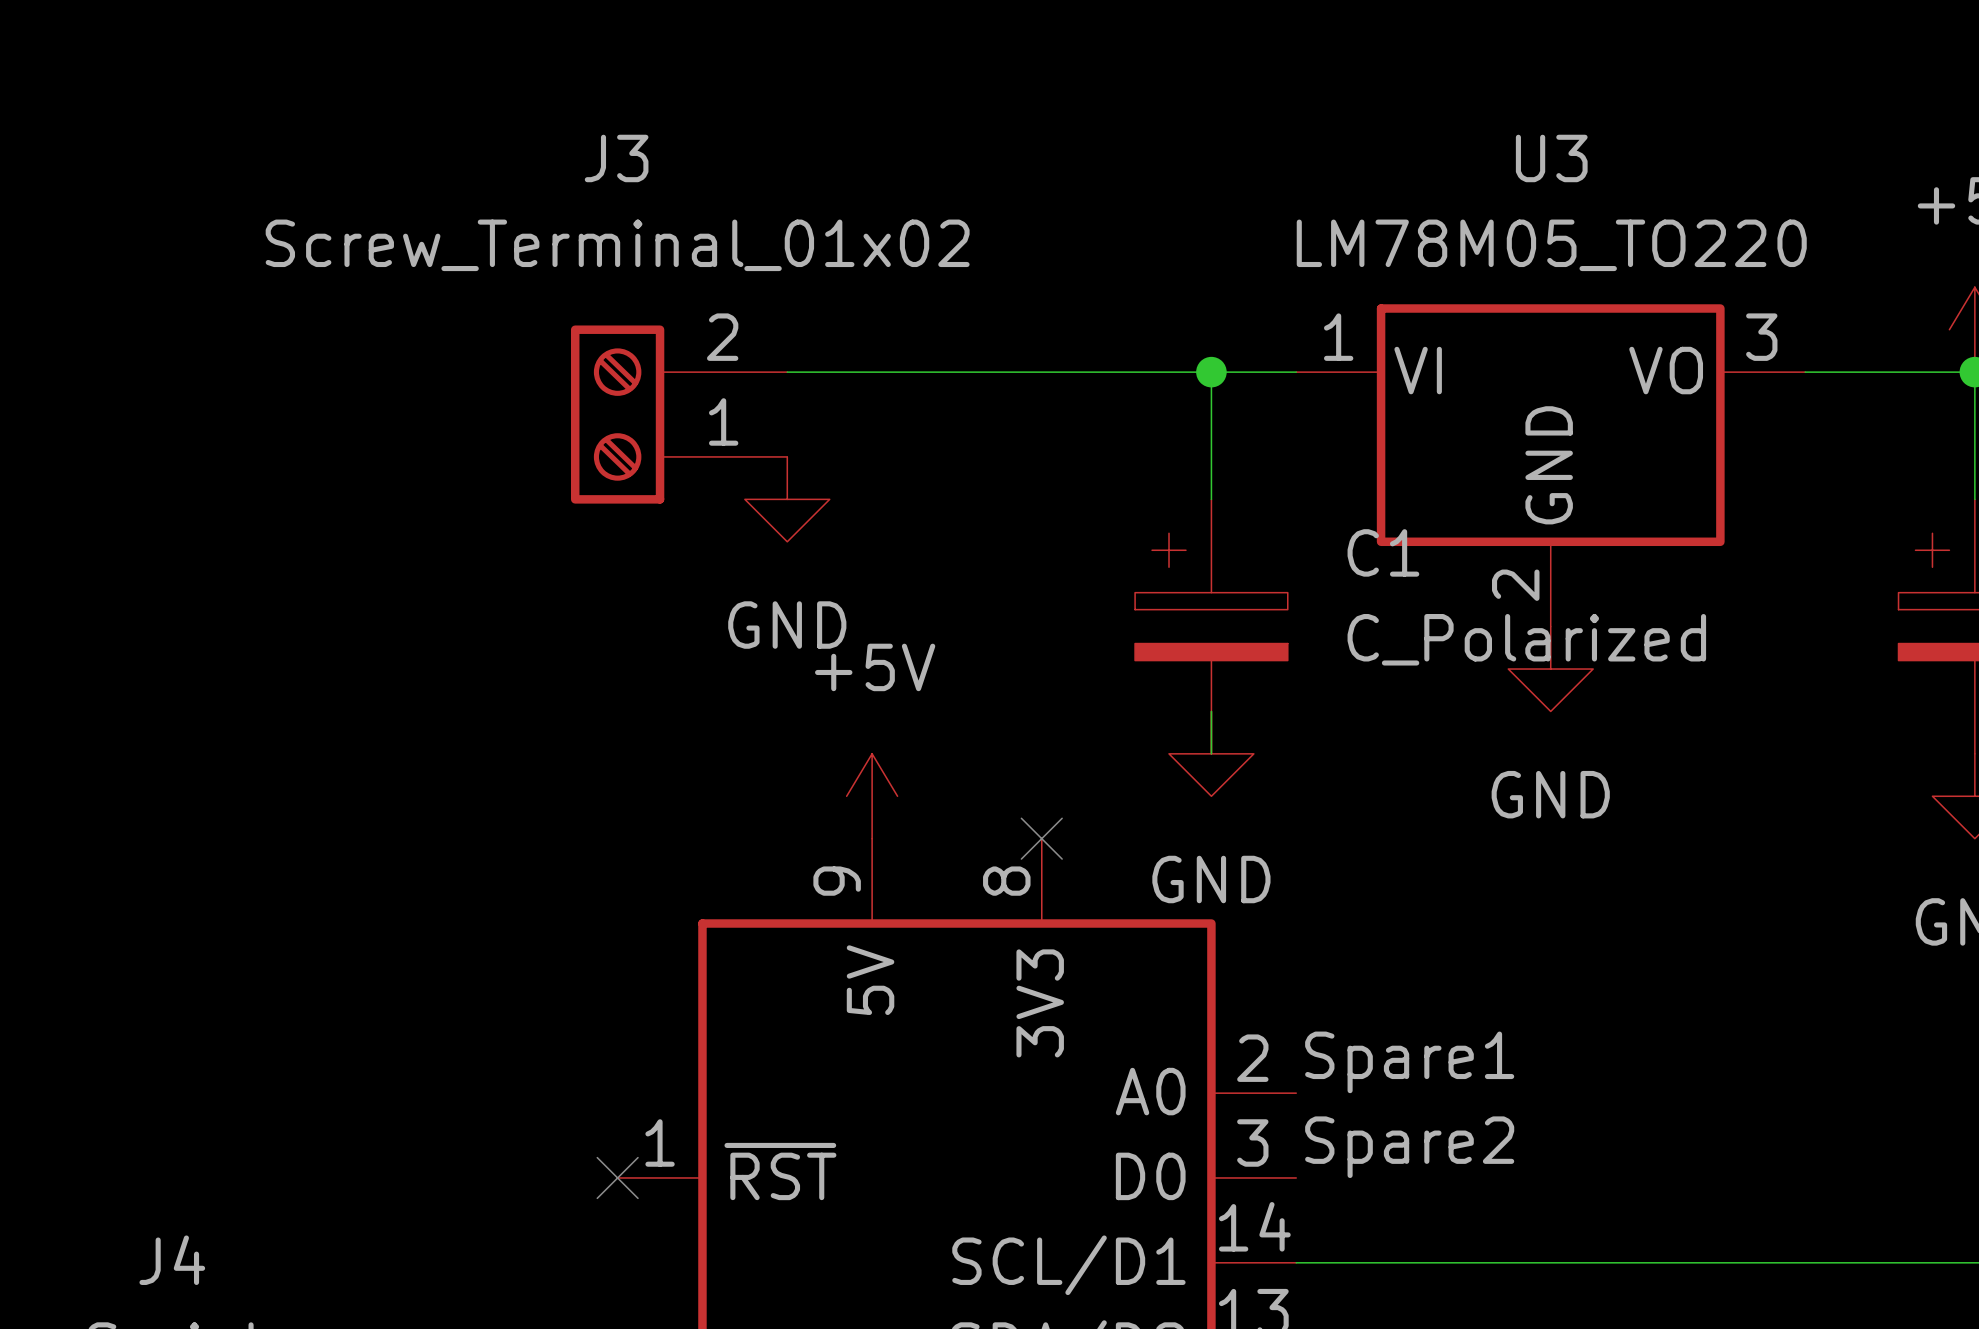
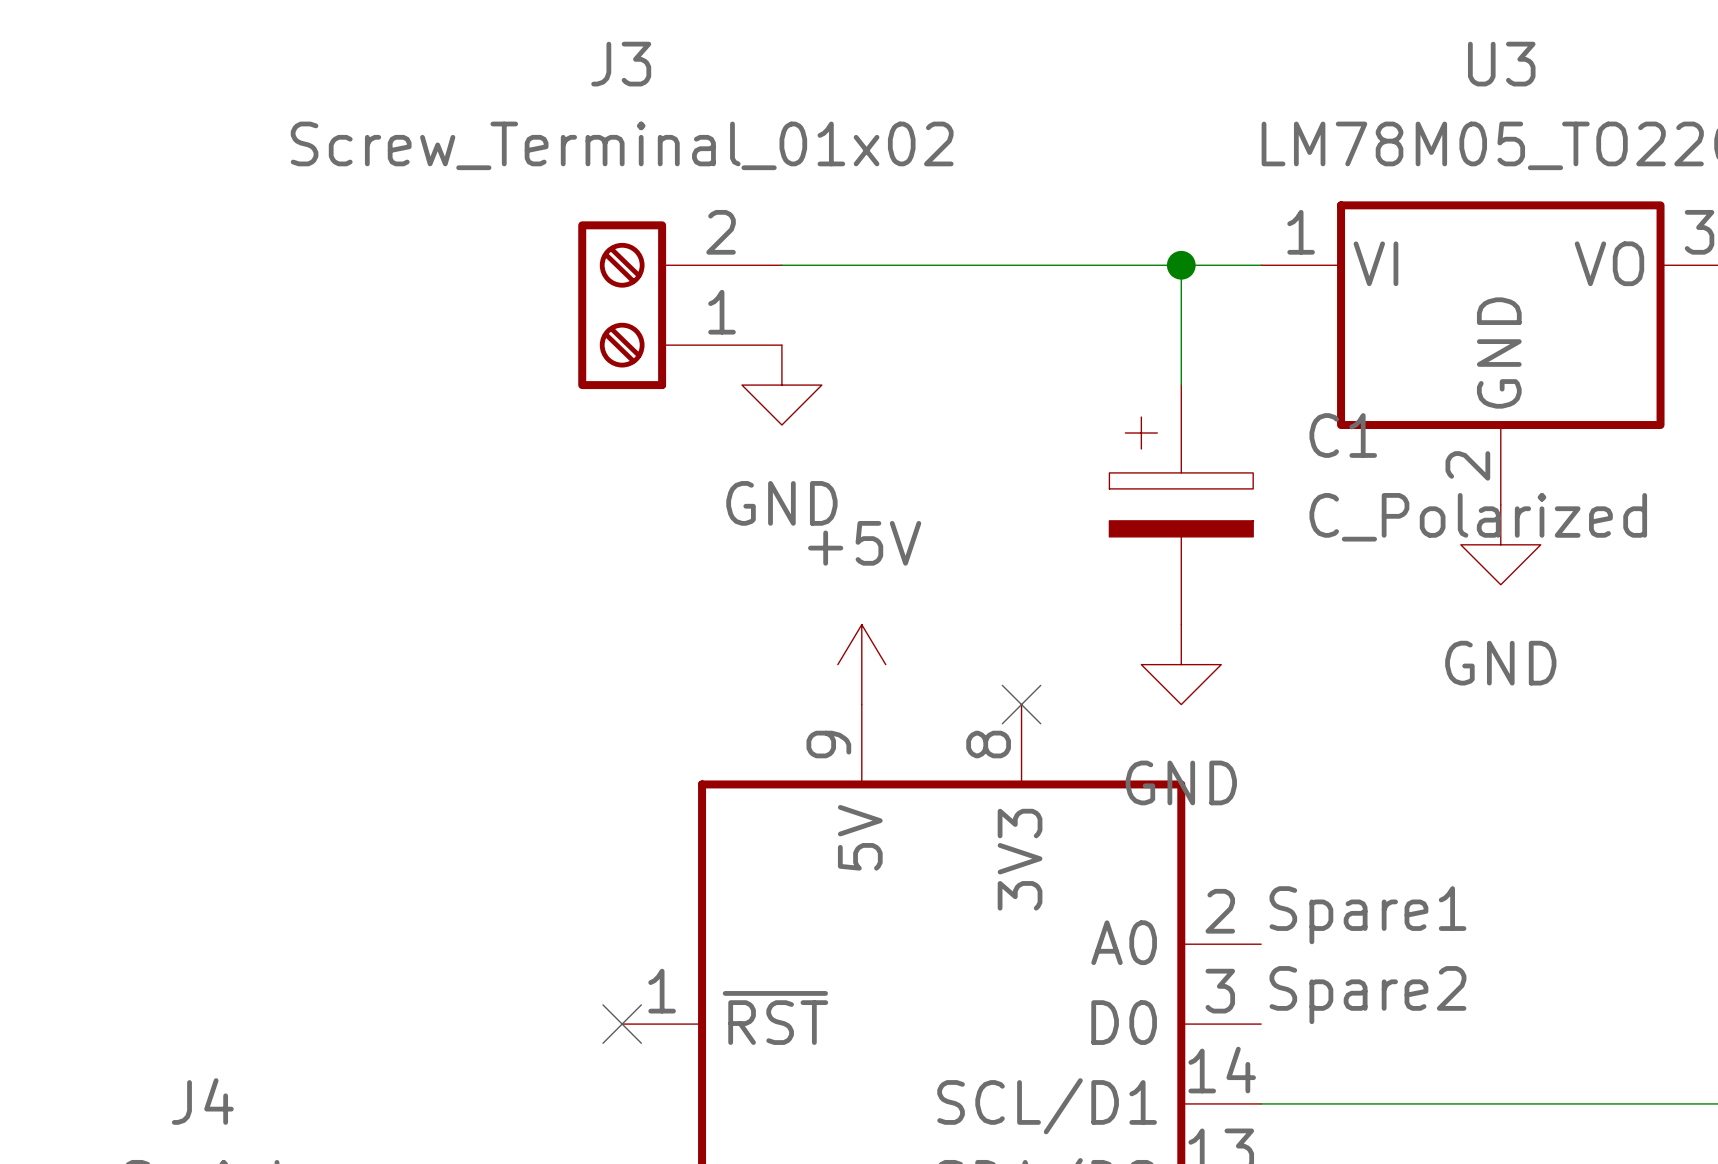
power symbol position: GND (1211, 753) -> GND (1181, 664)

